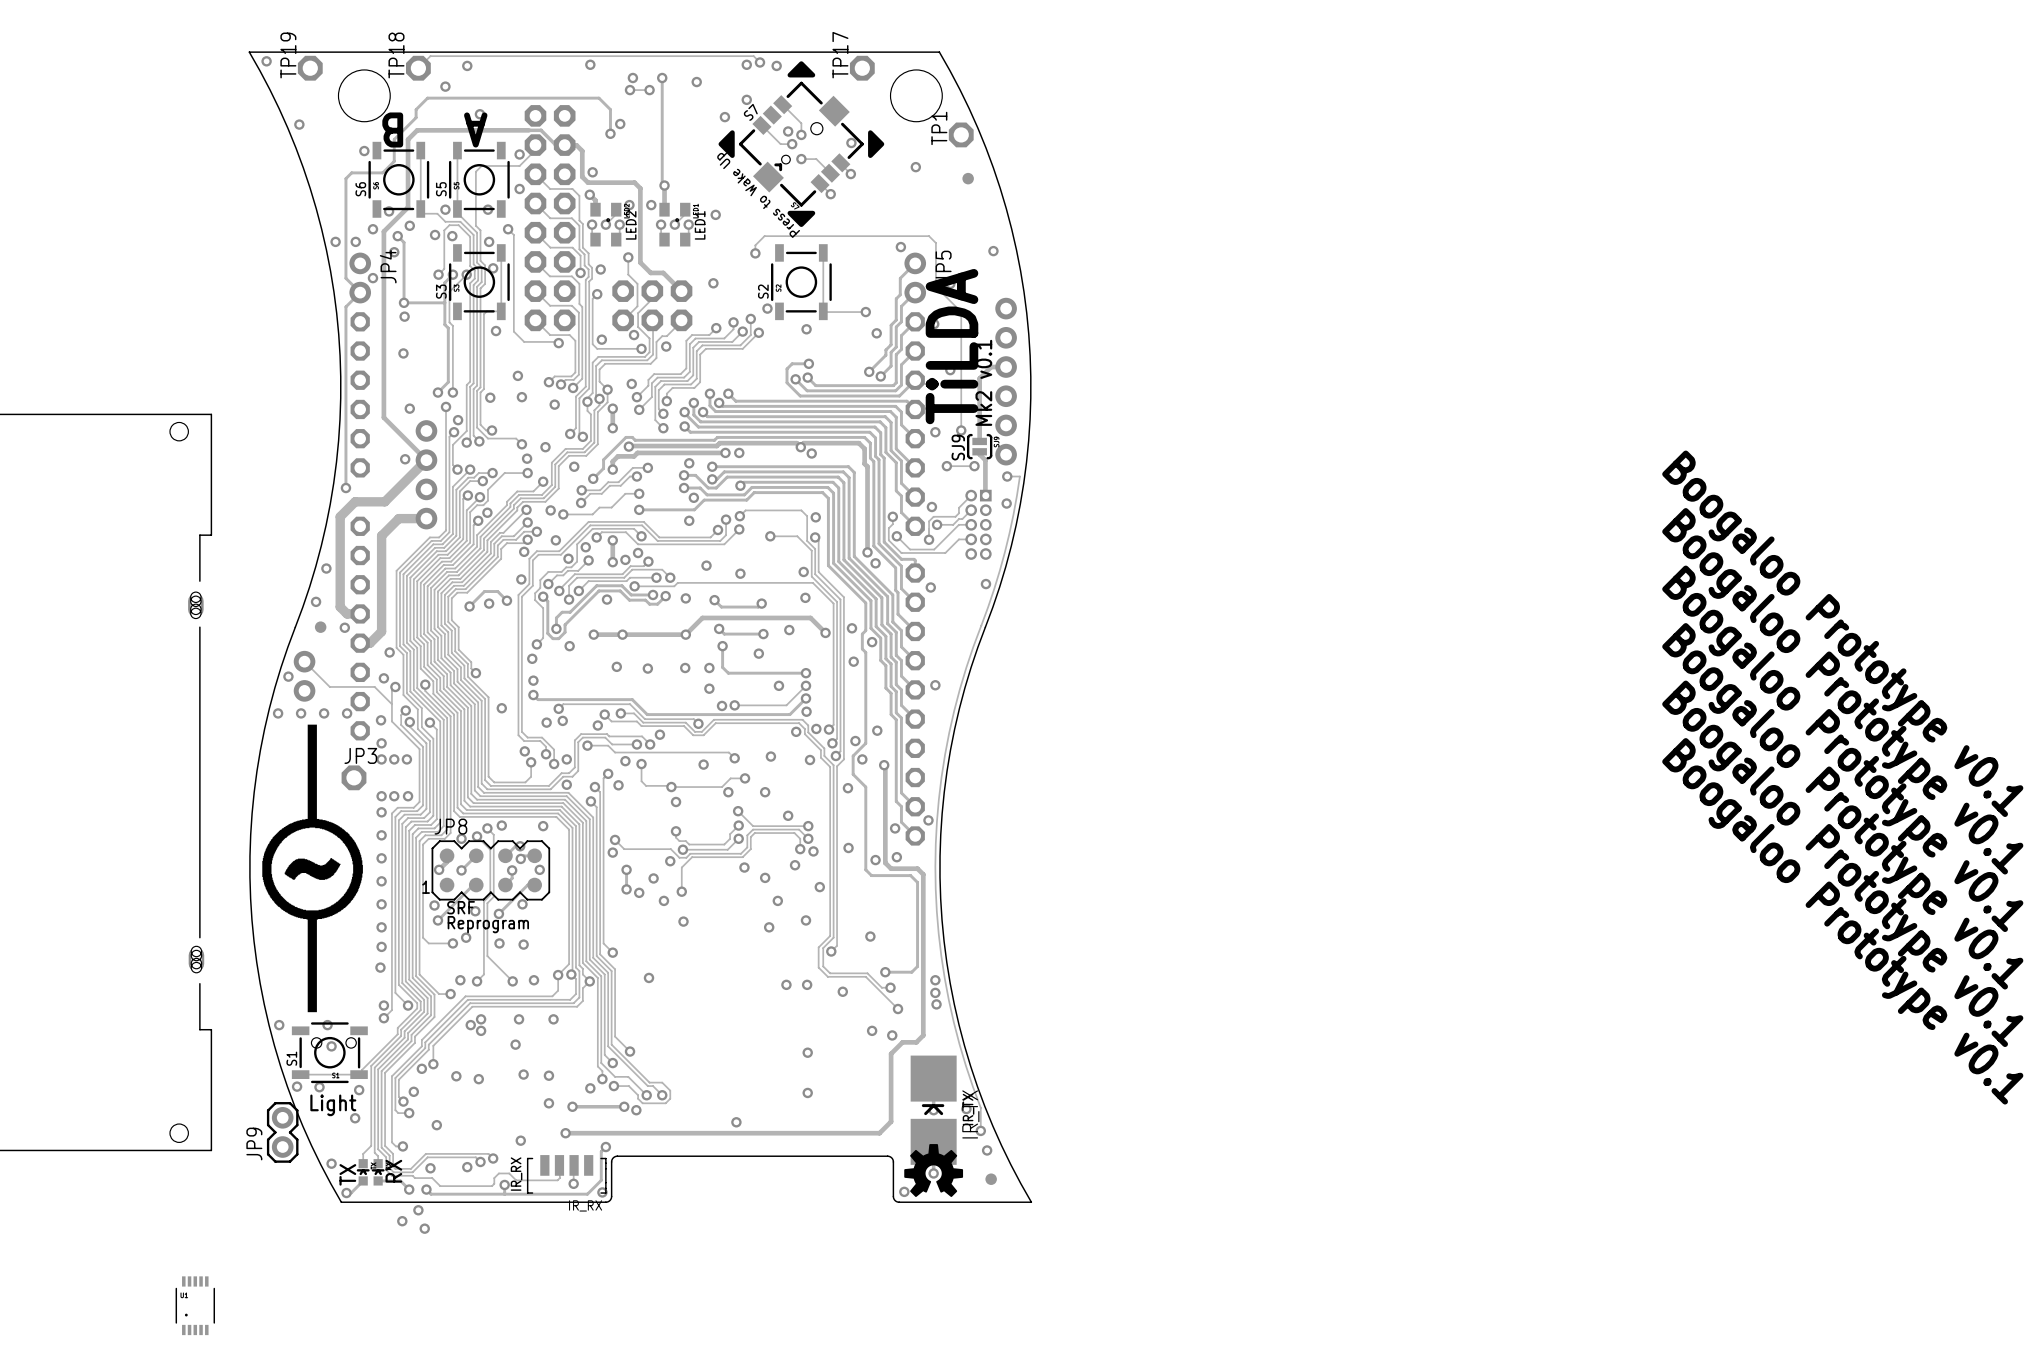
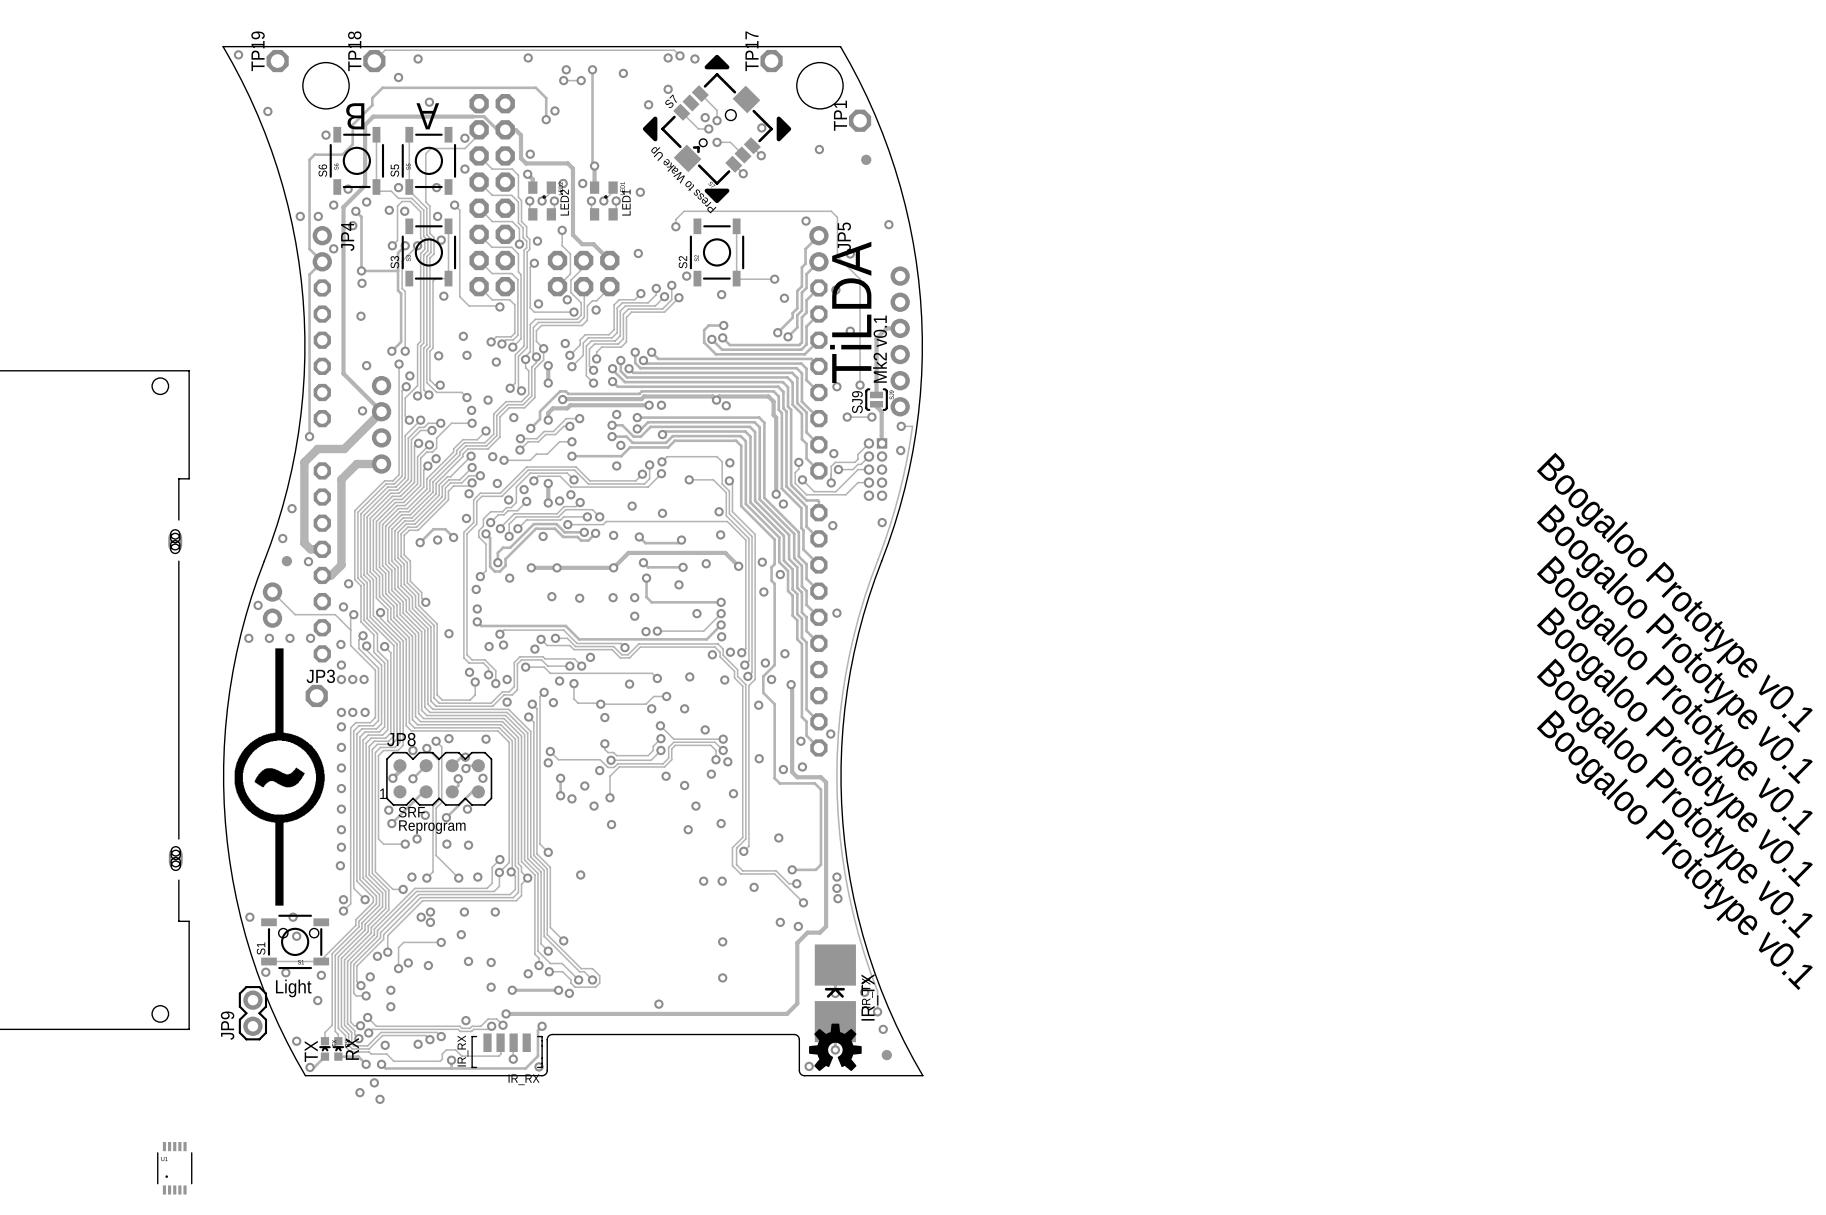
track: none -> (499, 859) (492, 867) (492, 883) (487, 888) (415, 888) (374, 929) (374, 934) (347, 961) (347, 1023) (358, 1038)
via: none -> (499, 859)
track: none -> (441, 942) (403, 942) (398, 947) (398, 968)
via: none -> (441, 942)
via: none -> (398, 968)
via: none -> (390, 990)
track: none -> (367, 1017) (376, 1026) (459, 1026) (461, 1028) (470, 1028) (472, 1026) (480, 1026) (488, 1019) (496, 1019) (502, 1025)
via: none -> (367, 1017)
via: none -> (502, 1025)
track: none -> (491, 1026) (488, 1029) (473, 1029) (471, 1031) (460, 1031) (458, 1029) (372, 1029) (368, 1032)
via: none -> (491, 1026)
via: none -> (368, 1032)
via: none -> (358, 1038)

